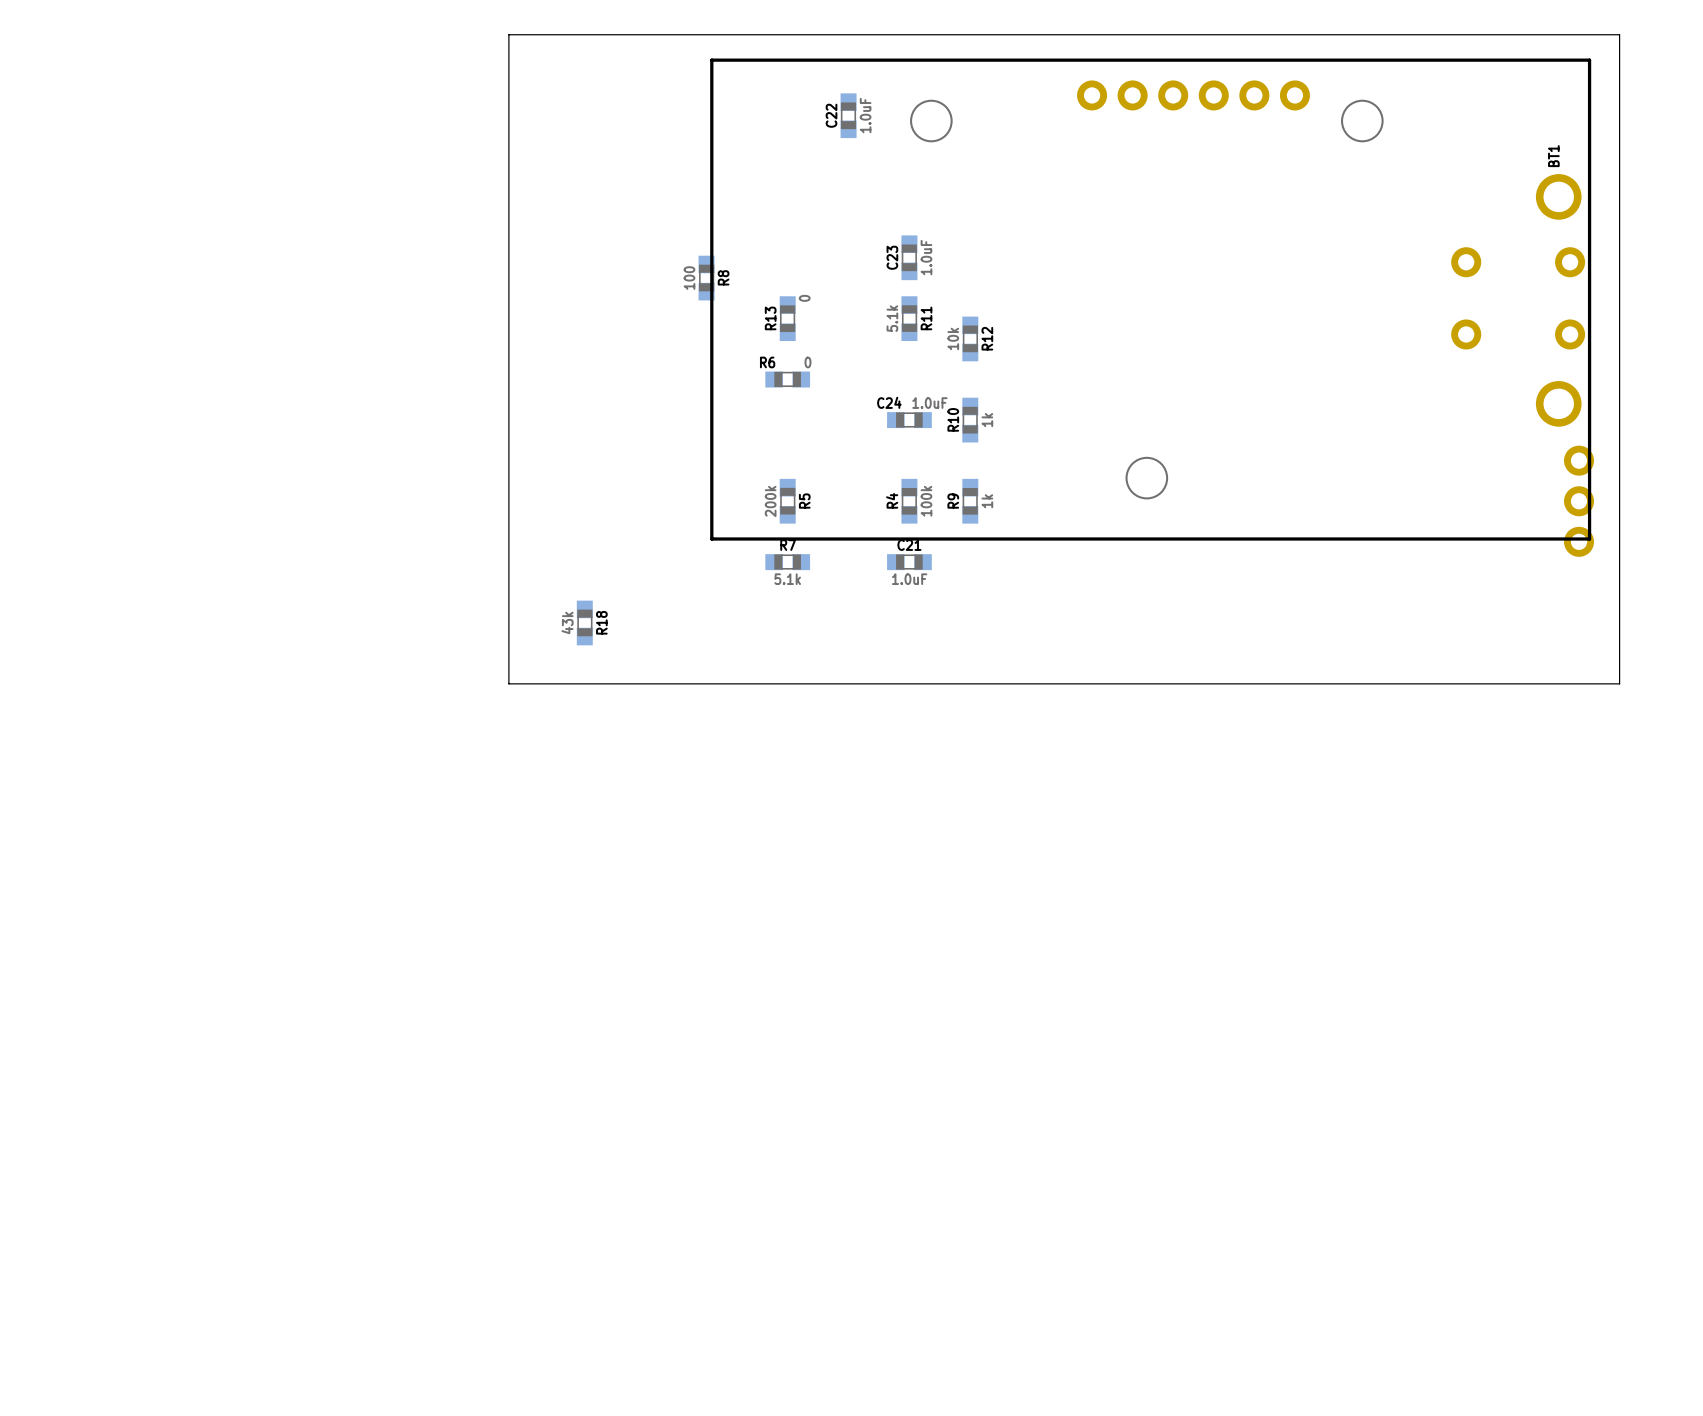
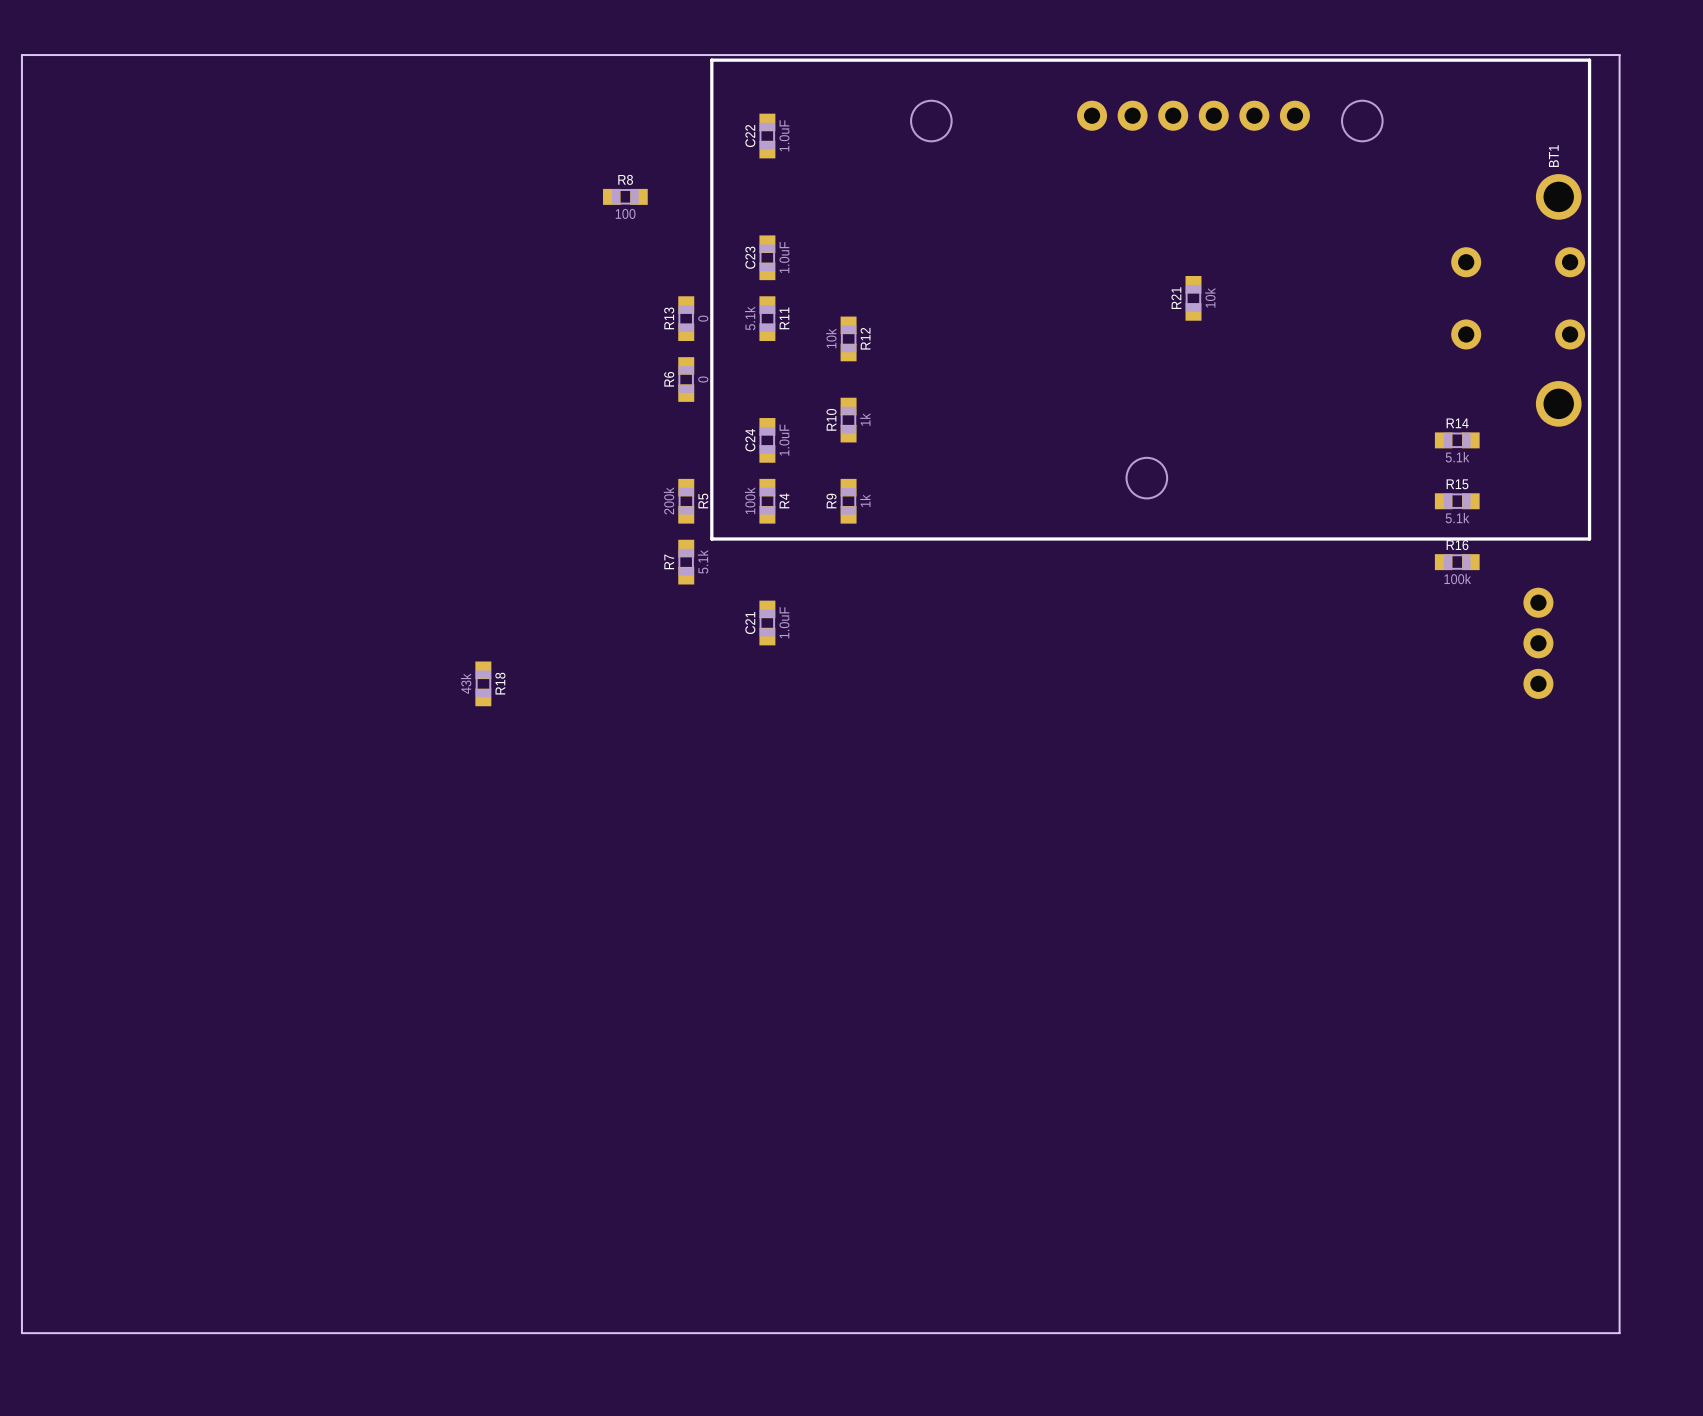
board edge: (1619, 55) (1619, 34) (508, 34) (508, 683) (1619, 683) -> (1619, 55) (21, 55) (21, 1333) (1619, 1333) (1619, 683)
part position: (1193, 95) -> (1193, 115)
C22 position: (848, 115) -> (767, 136)
C23 position: (909, 257) -> (767, 257)
R8 rotation: 0° (706, 278) -> 90° clockwise (625, 196)
R8 position: (706, 278) -> (625, 196)
R13 value position: 0 (804, 298) -> 0 (703, 318)
R21: none -> 10k (1193, 298)
R13 position: (787, 318) -> (686, 318)
R11 position: (909, 318) -> (767, 318)
R12 position: (970, 338) -> (848, 338)
R6 rotation: 0° (787, 379) -> 90° clockwise (686, 379)
R6 position: (787, 379) -> (686, 379)
C24 rotation: 0° (909, 420) -> 90° clockwise (767, 440)
C24 position: (909, 420) -> (767, 440)
R10 position: (970, 420) -> (848, 420)
R14: none -> 5.1k (1457, 440)
R4 name position: R4 (892, 500) -> R4 (784, 500)
R5 position: (787, 501) -> (686, 501)
R4 position: (909, 501) -> (767, 501)
R4 value position: 100k (926, 501) -> 100k (750, 500)
R9 position: (970, 501) -> (848, 501)
R15: none -> 5.1k (1457, 501)
part position: (1579, 501) -> (1538, 643)
R7 rotation: 0° (787, 562) -> 90° clockwise (686, 562)
R7 position: (787, 562) -> (686, 562)
C21 rotation: 0° (909, 562) -> 90° clockwise (767, 622)
C21 position: (909, 562) -> (767, 622)
R16: none -> 100k (1457, 562)
R18 position: (584, 622) -> (483, 683)

